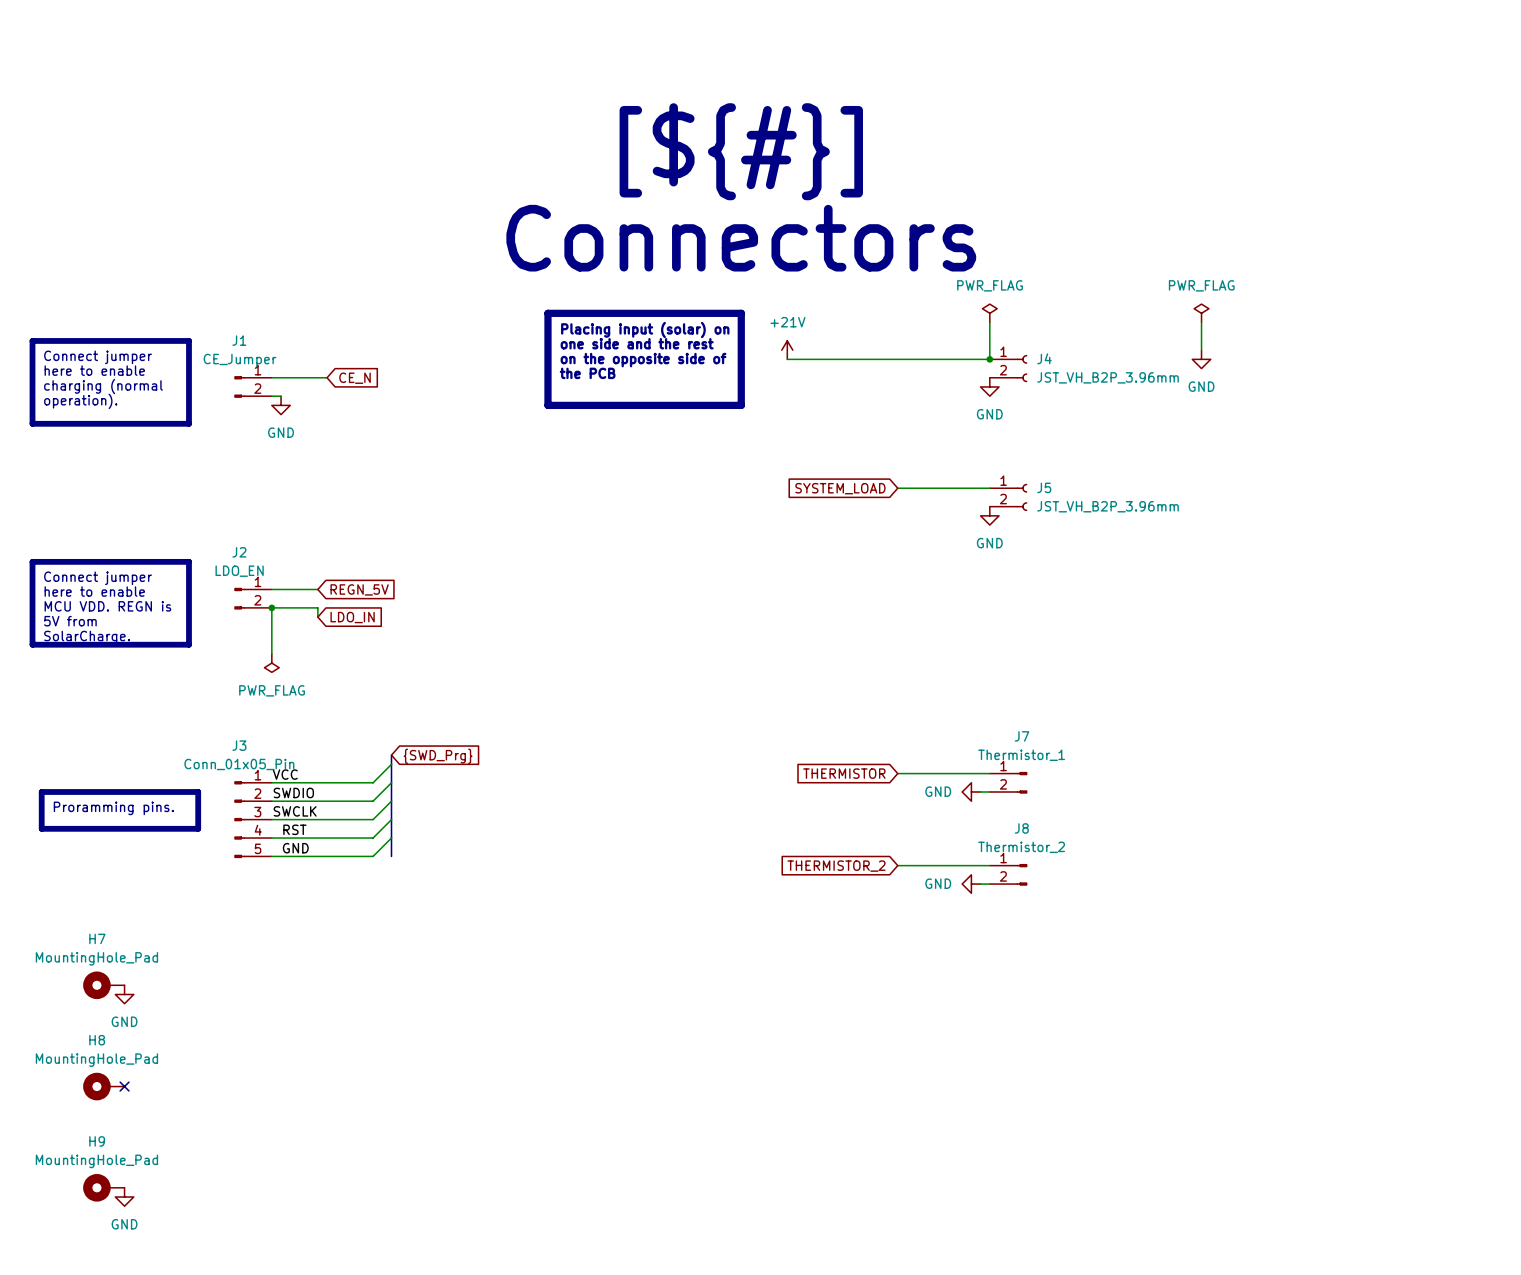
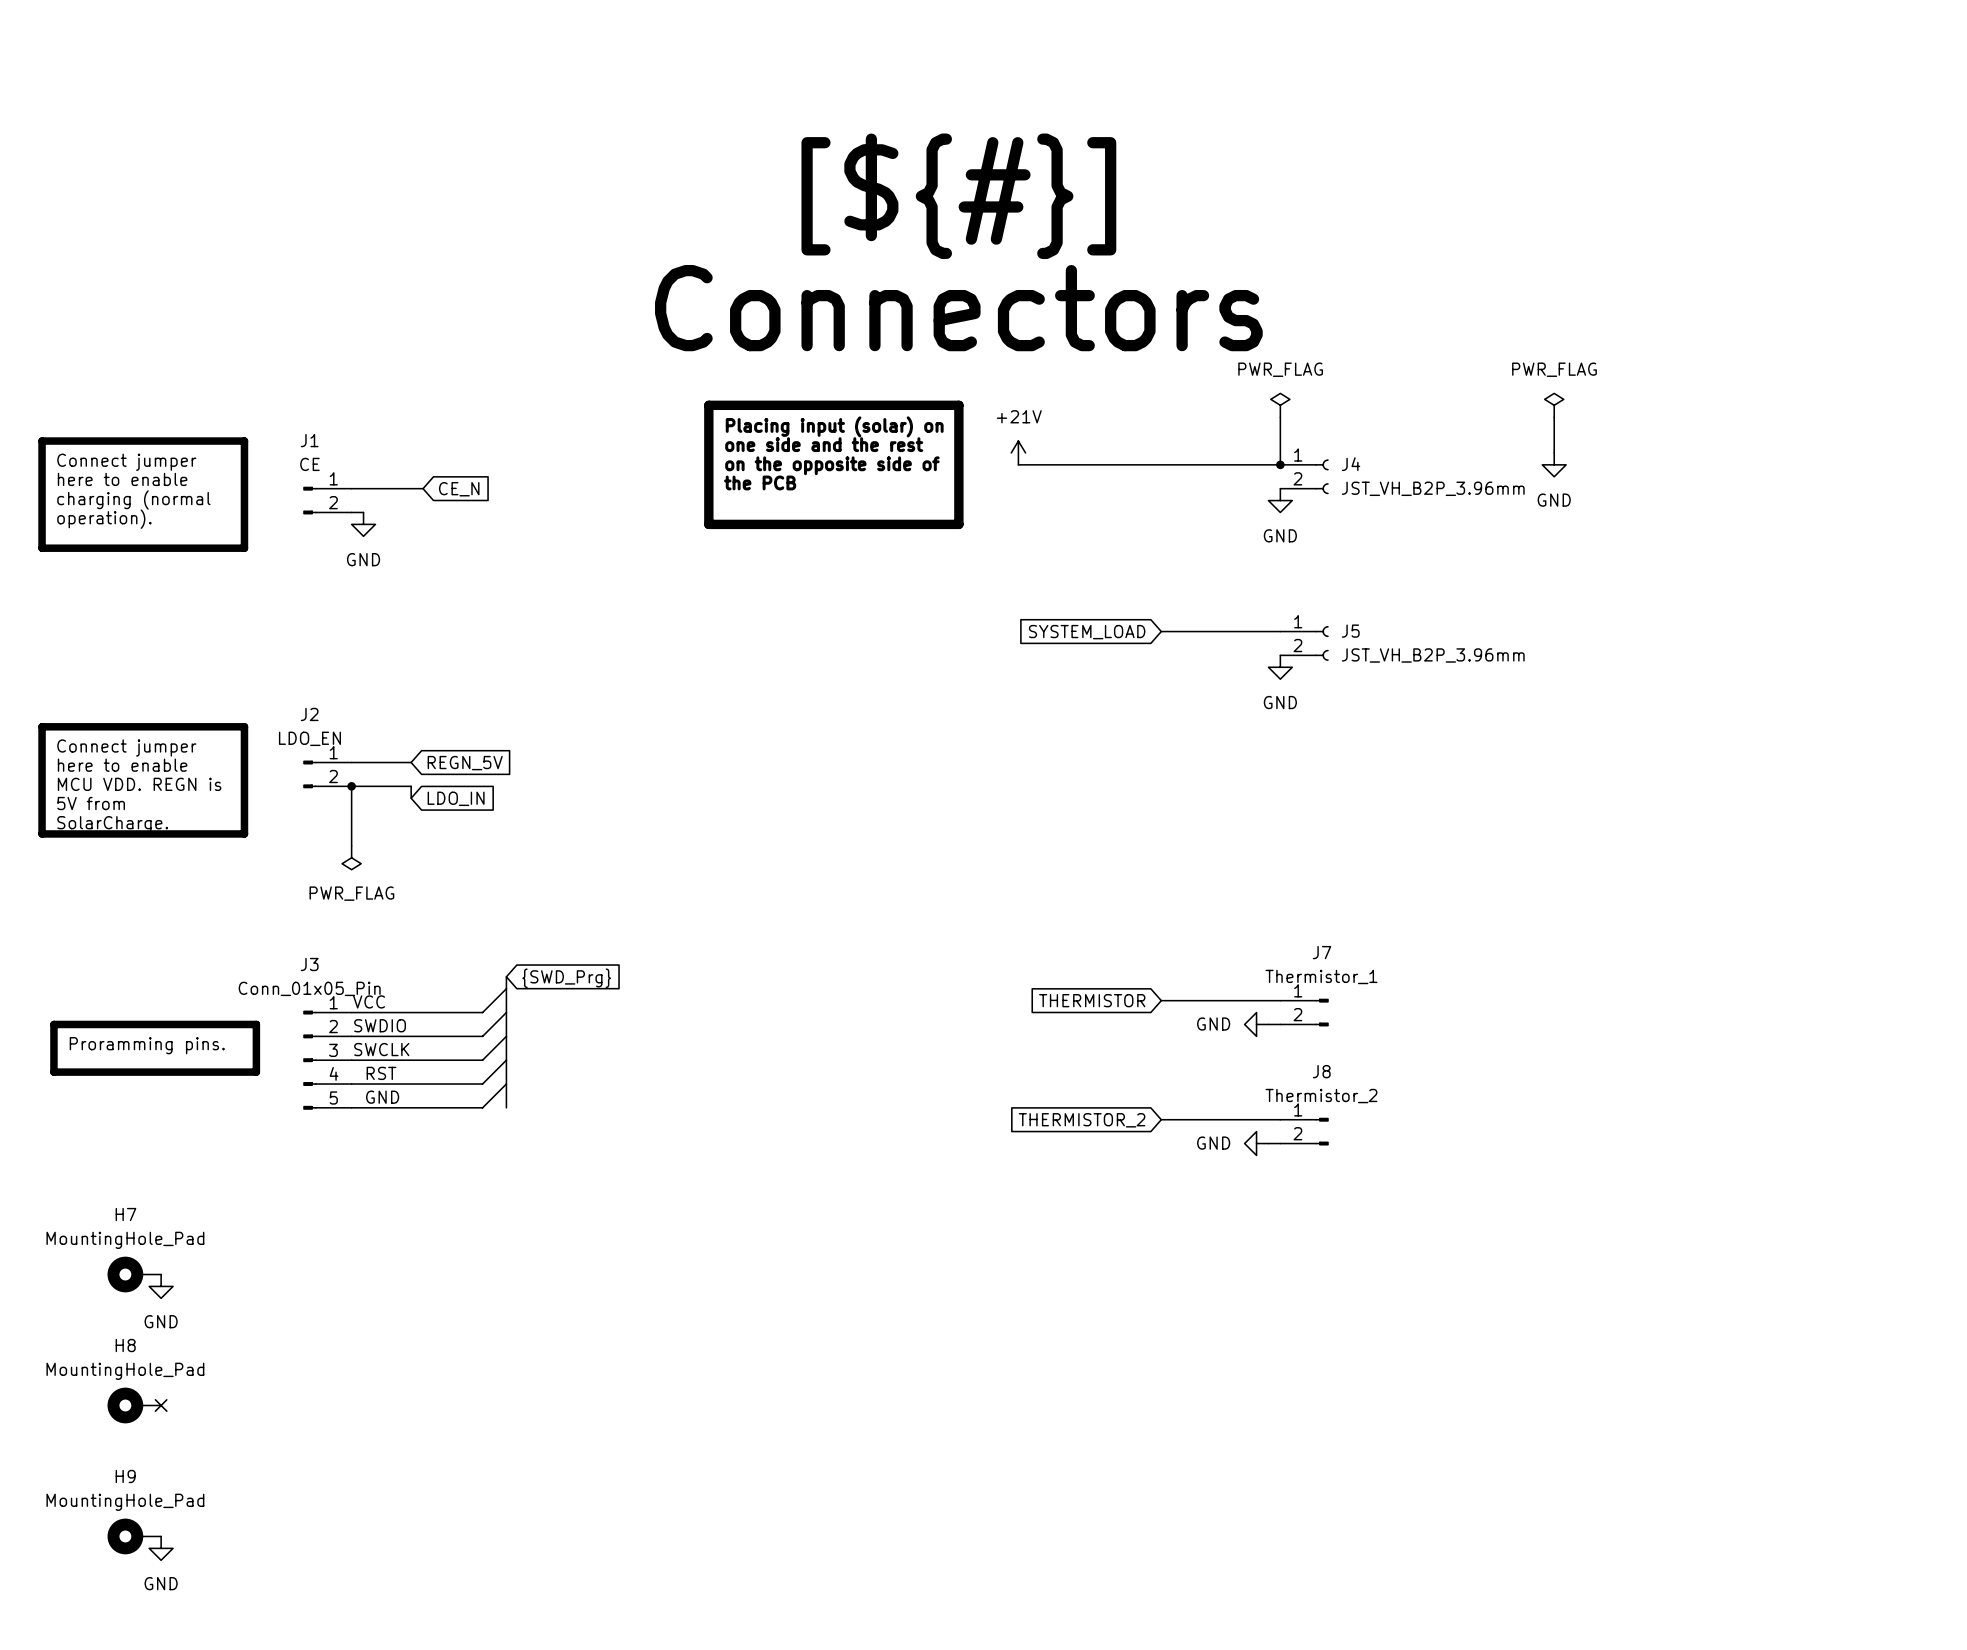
J1 value: CE_Jumper (240, 360) -> CE (309, 464)

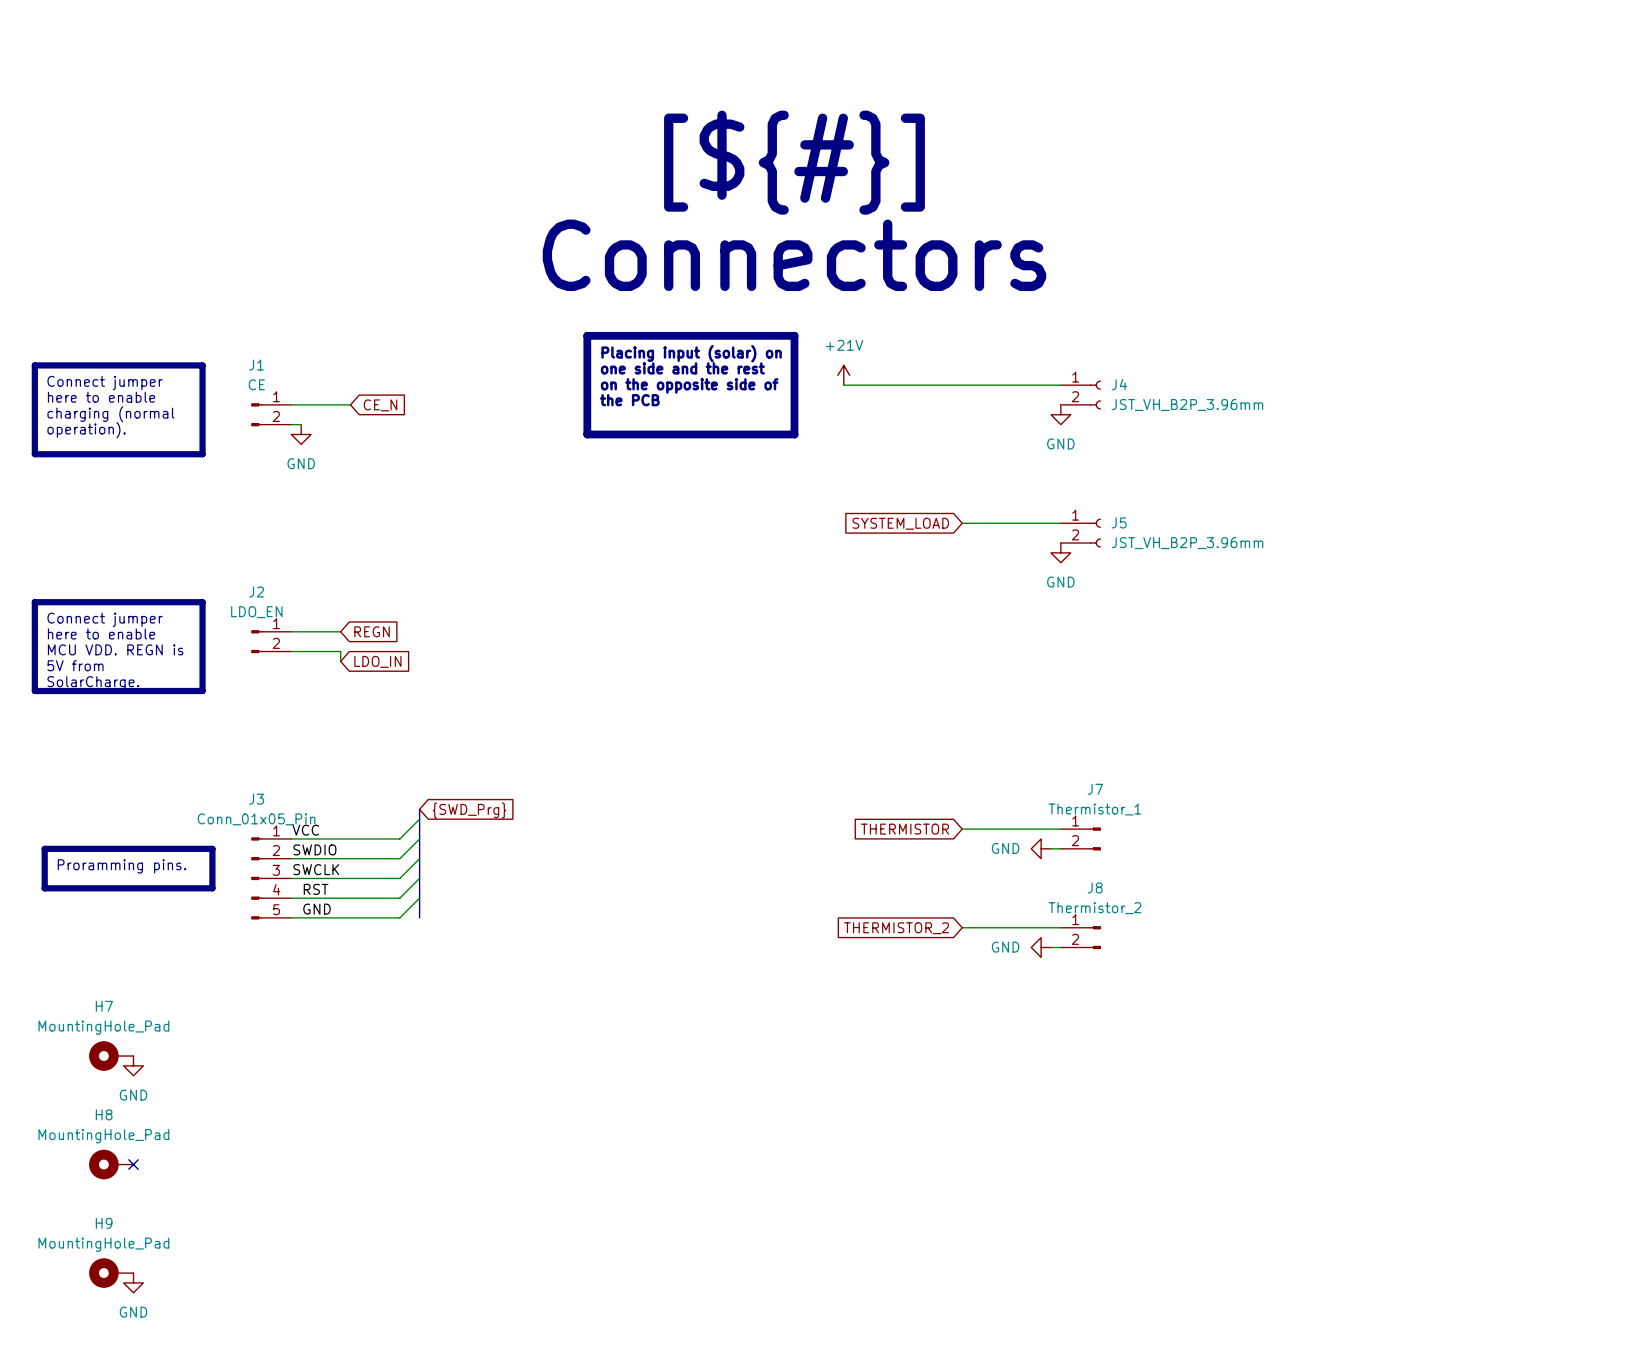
power symbol: PWR_FLAG (1280, 405) -> none
power symbol: PWR_FLAG (1554, 405) -> none
wire: (1280, 417) (1280, 464) -> none
wire: (1554, 417) (1554, 452) -> none
junction: (1280, 464) -> none
power symbol: GND (1554, 464) -> none
global label: REGN_5V (465, 763) -> REGN (372, 631)
wire: (351, 786) (351, 845) -> none
junction: (351, 786) -> none
power symbol: PWR_FLAG (351, 857) -> none

